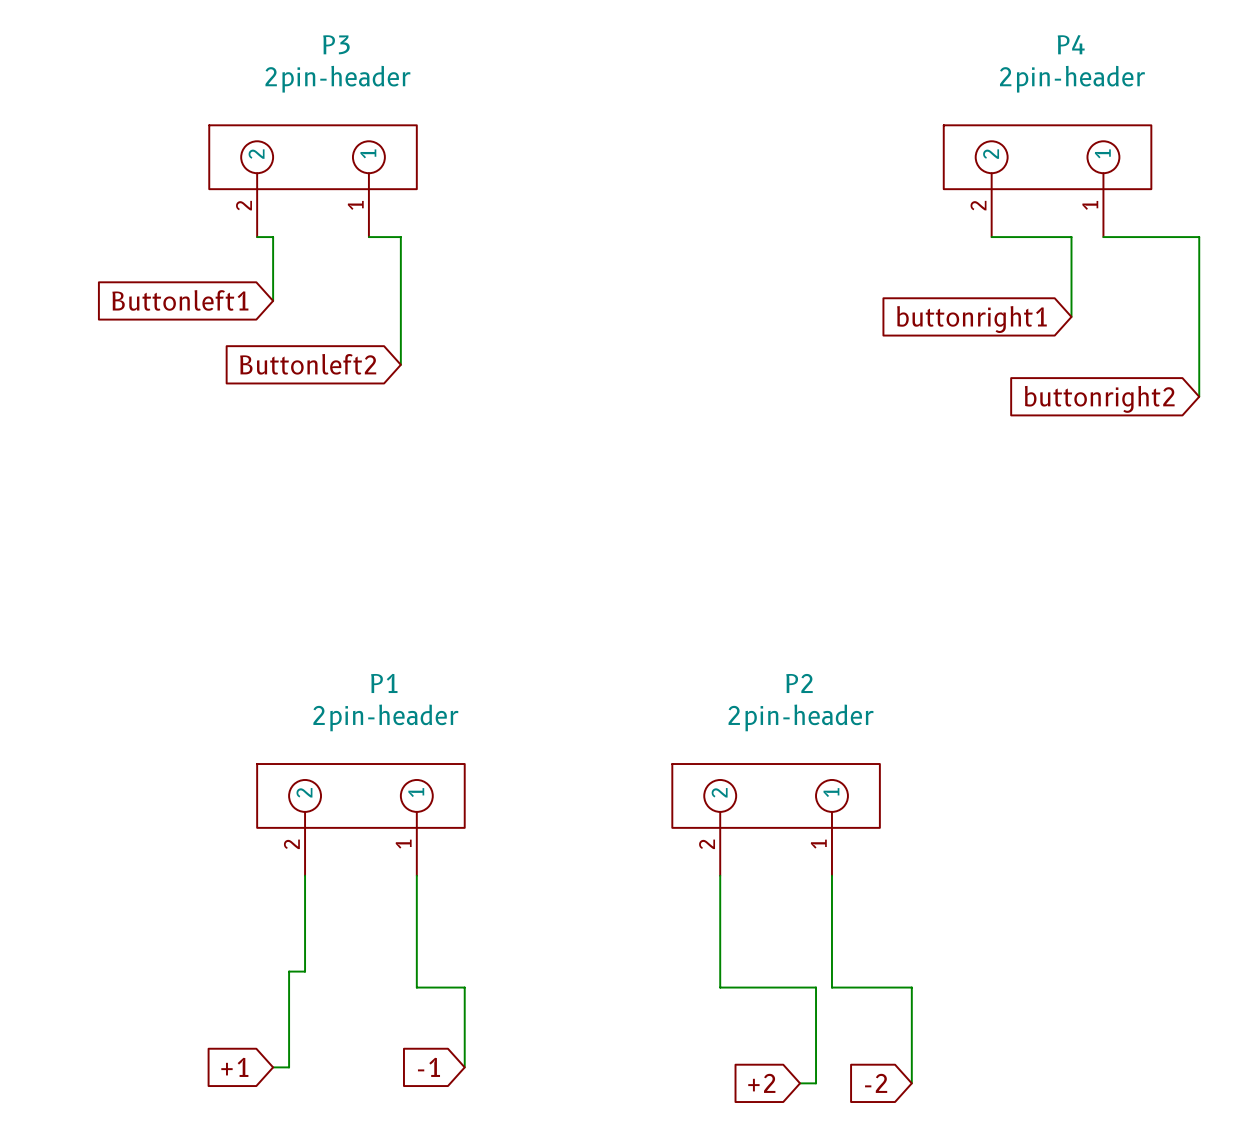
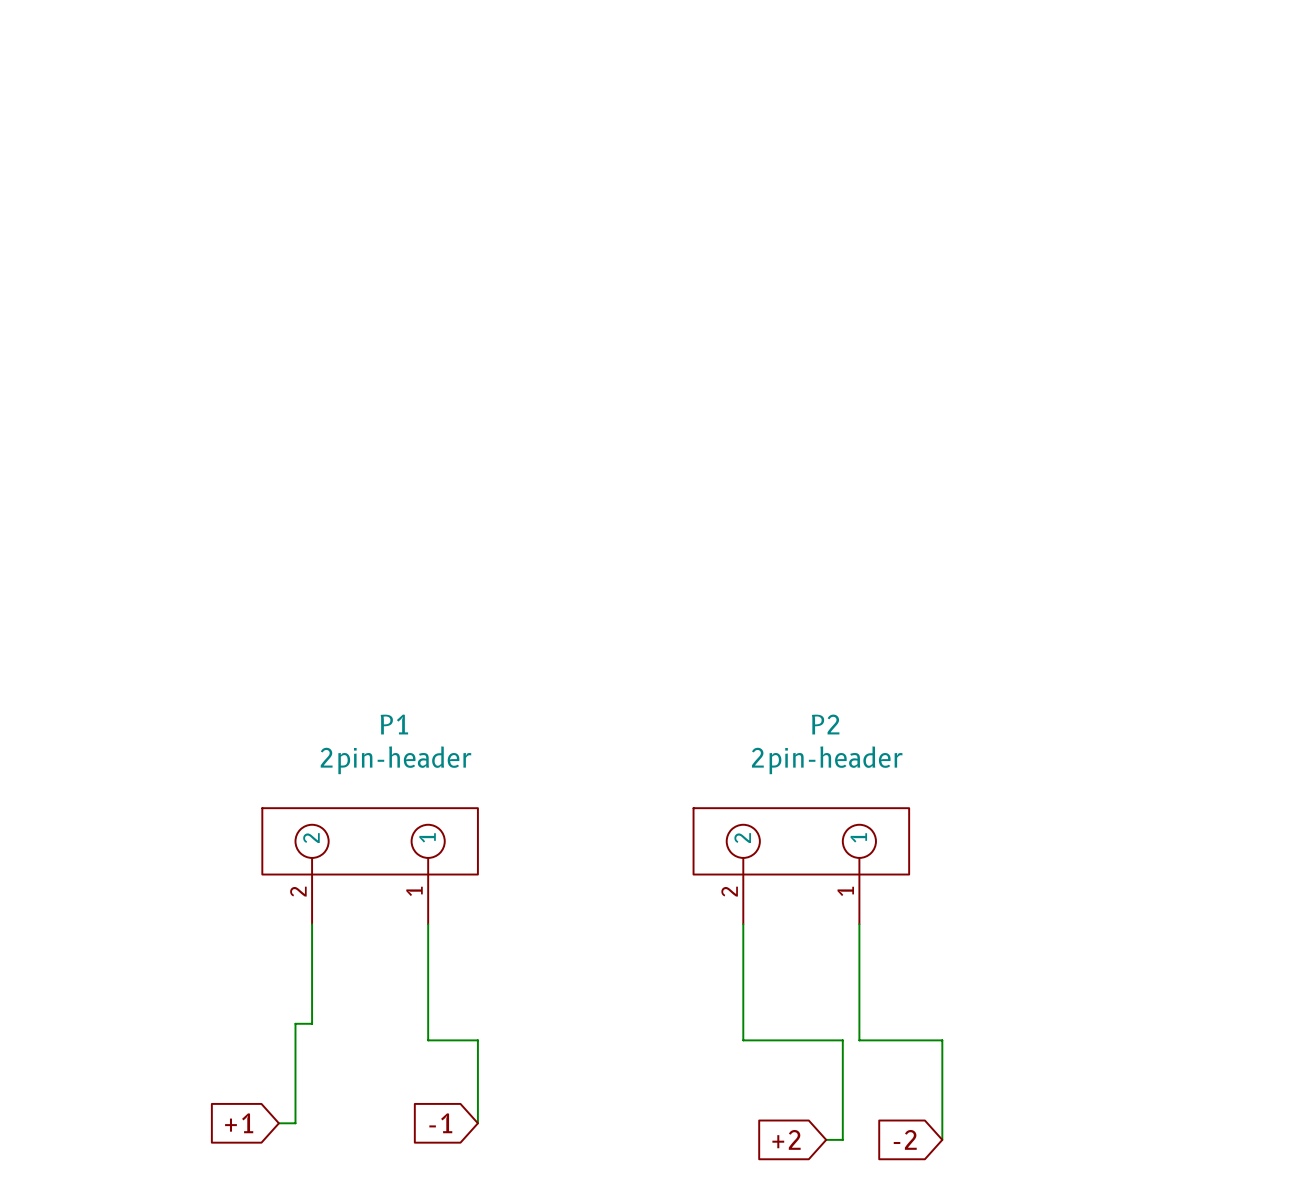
P3: 2pin-header (313, 181) -> none
P4: 2pin-header (1047, 181) -> none
wire: (257, 237) (273, 237) (273, 300) -> none
wire: (368, 237) (400, 237) (400, 364) -> none
wire: (991, 237) (1071, 237) (1071, 316) -> none
wire: (1103, 237) (1199, 237) (1199, 396) -> none
global label: Buttonleft1 (180, 300) -> none
global label: buttonright1 (971, 319) -> none
global label: Buttonleft2 (308, 364) -> none
global label: buttonright2 (1099, 399) -> none

